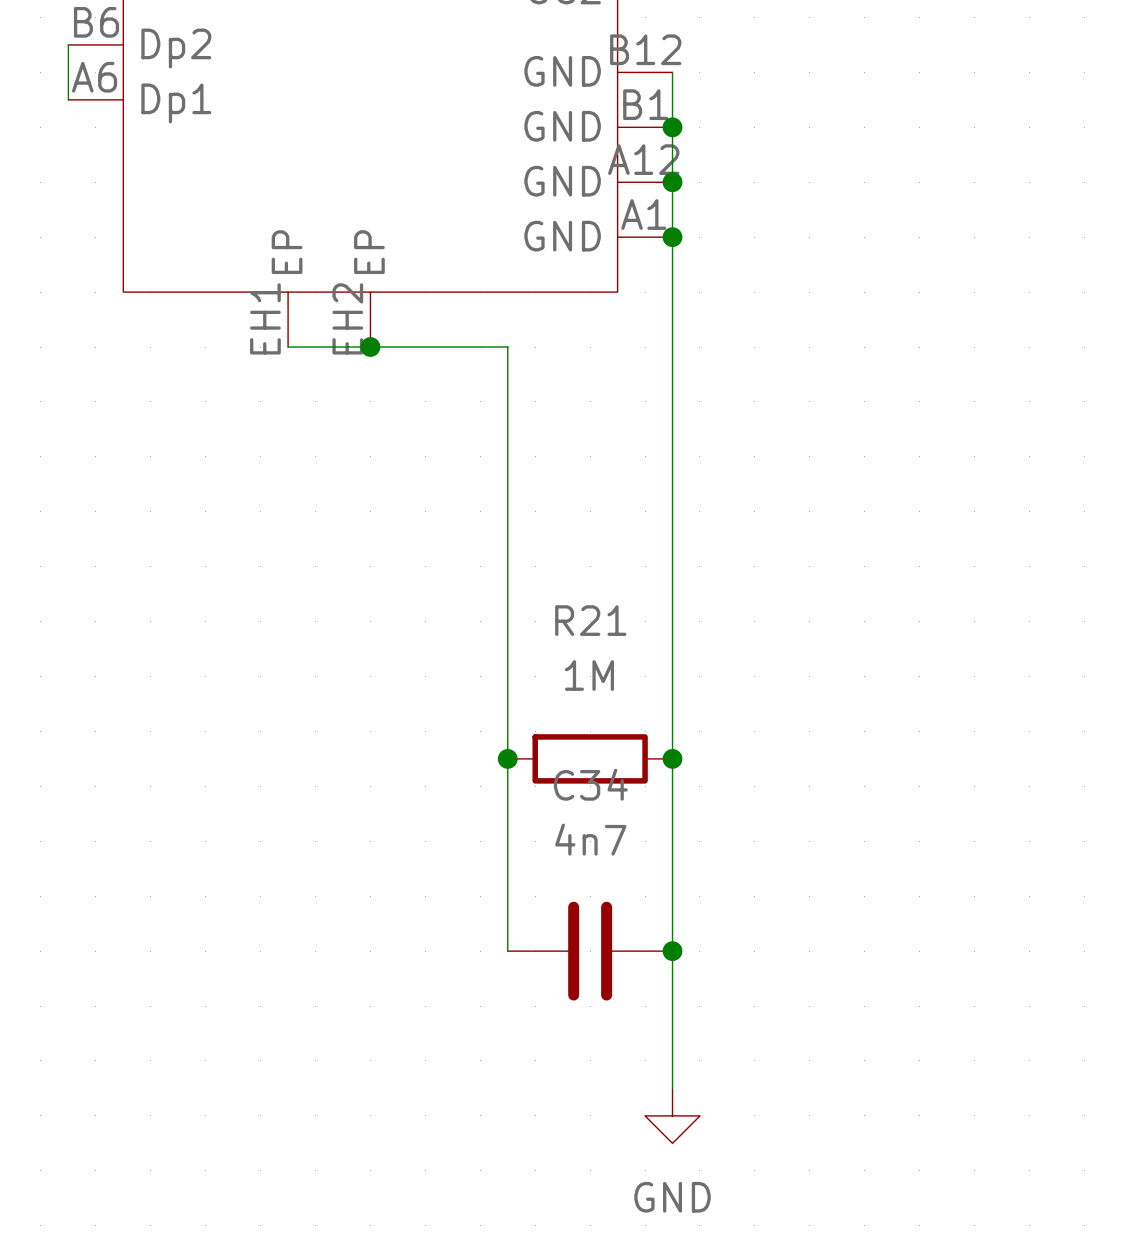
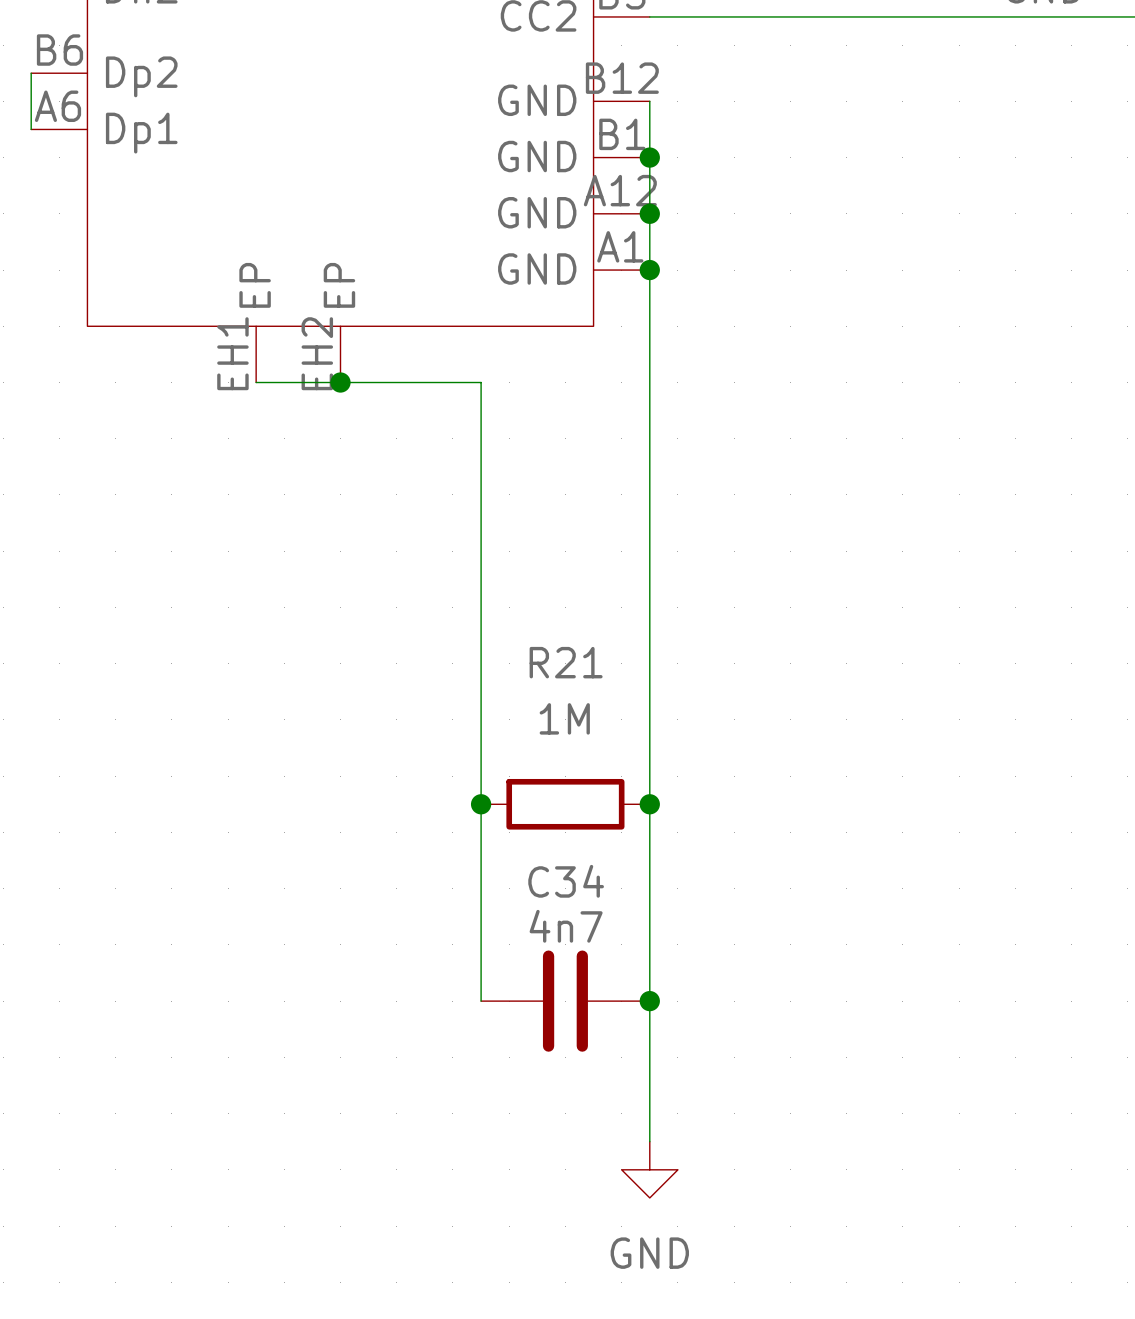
C34 name position: C34 (590, 784) -> C34 (566, 881)
C34 value position: 4n7 (590, 839) -> 4n7 (566, 926)

